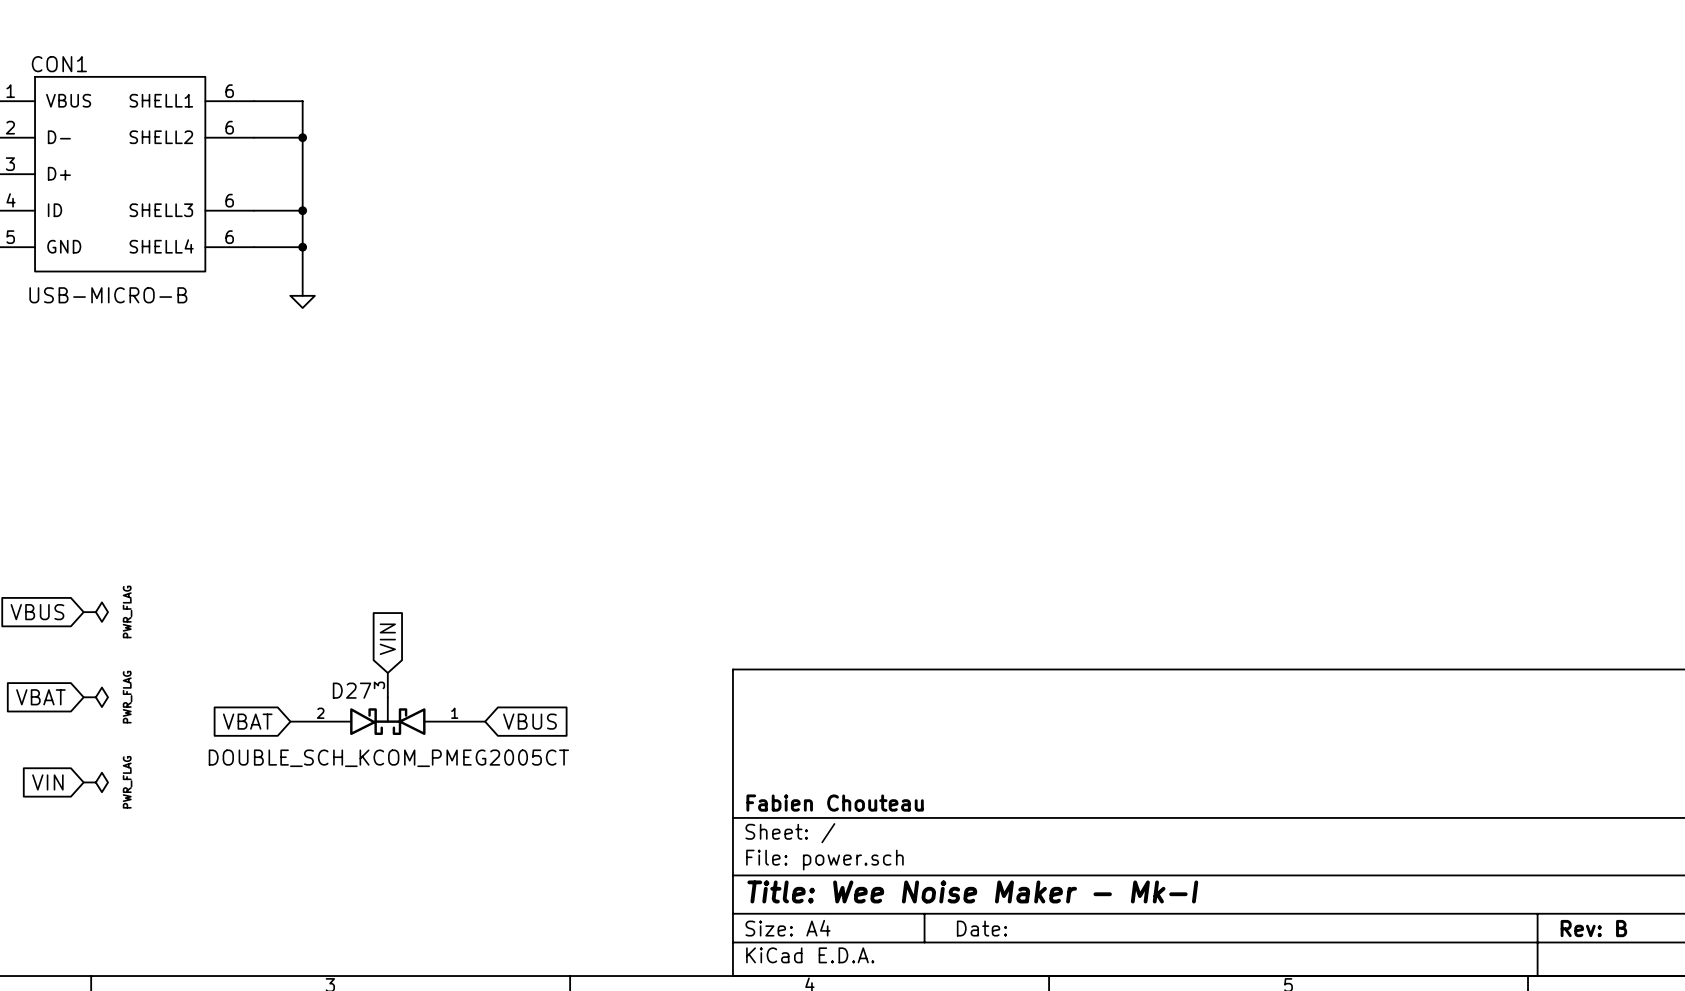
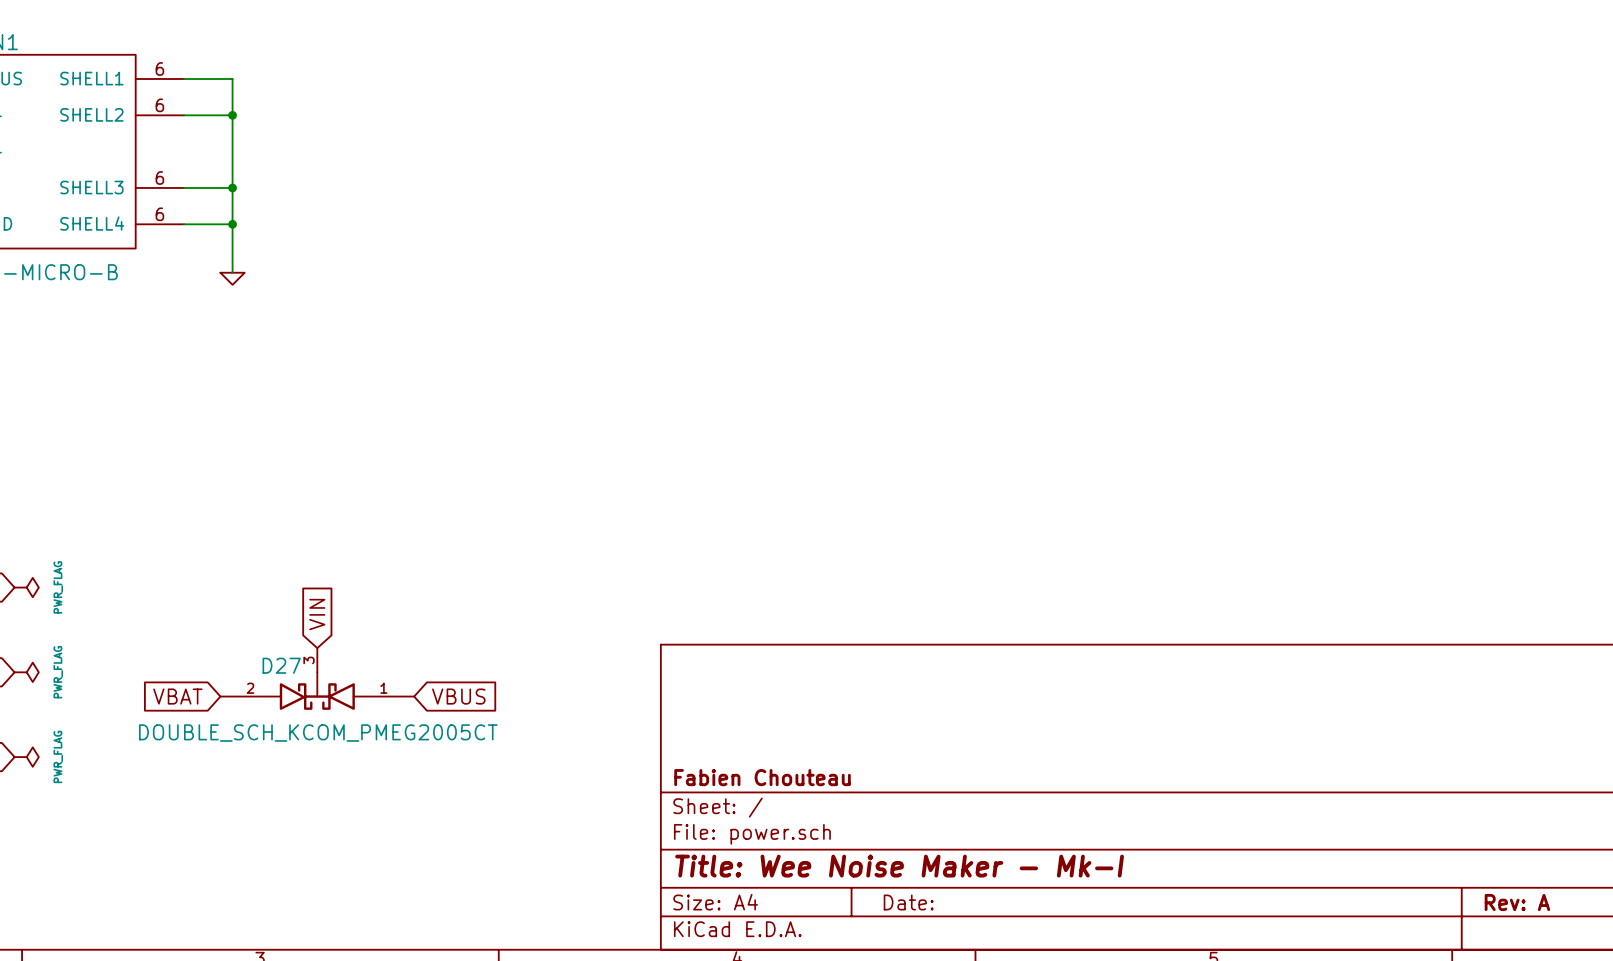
title block: Rev: B (1593, 928) -> Rev: A (1517, 902)

